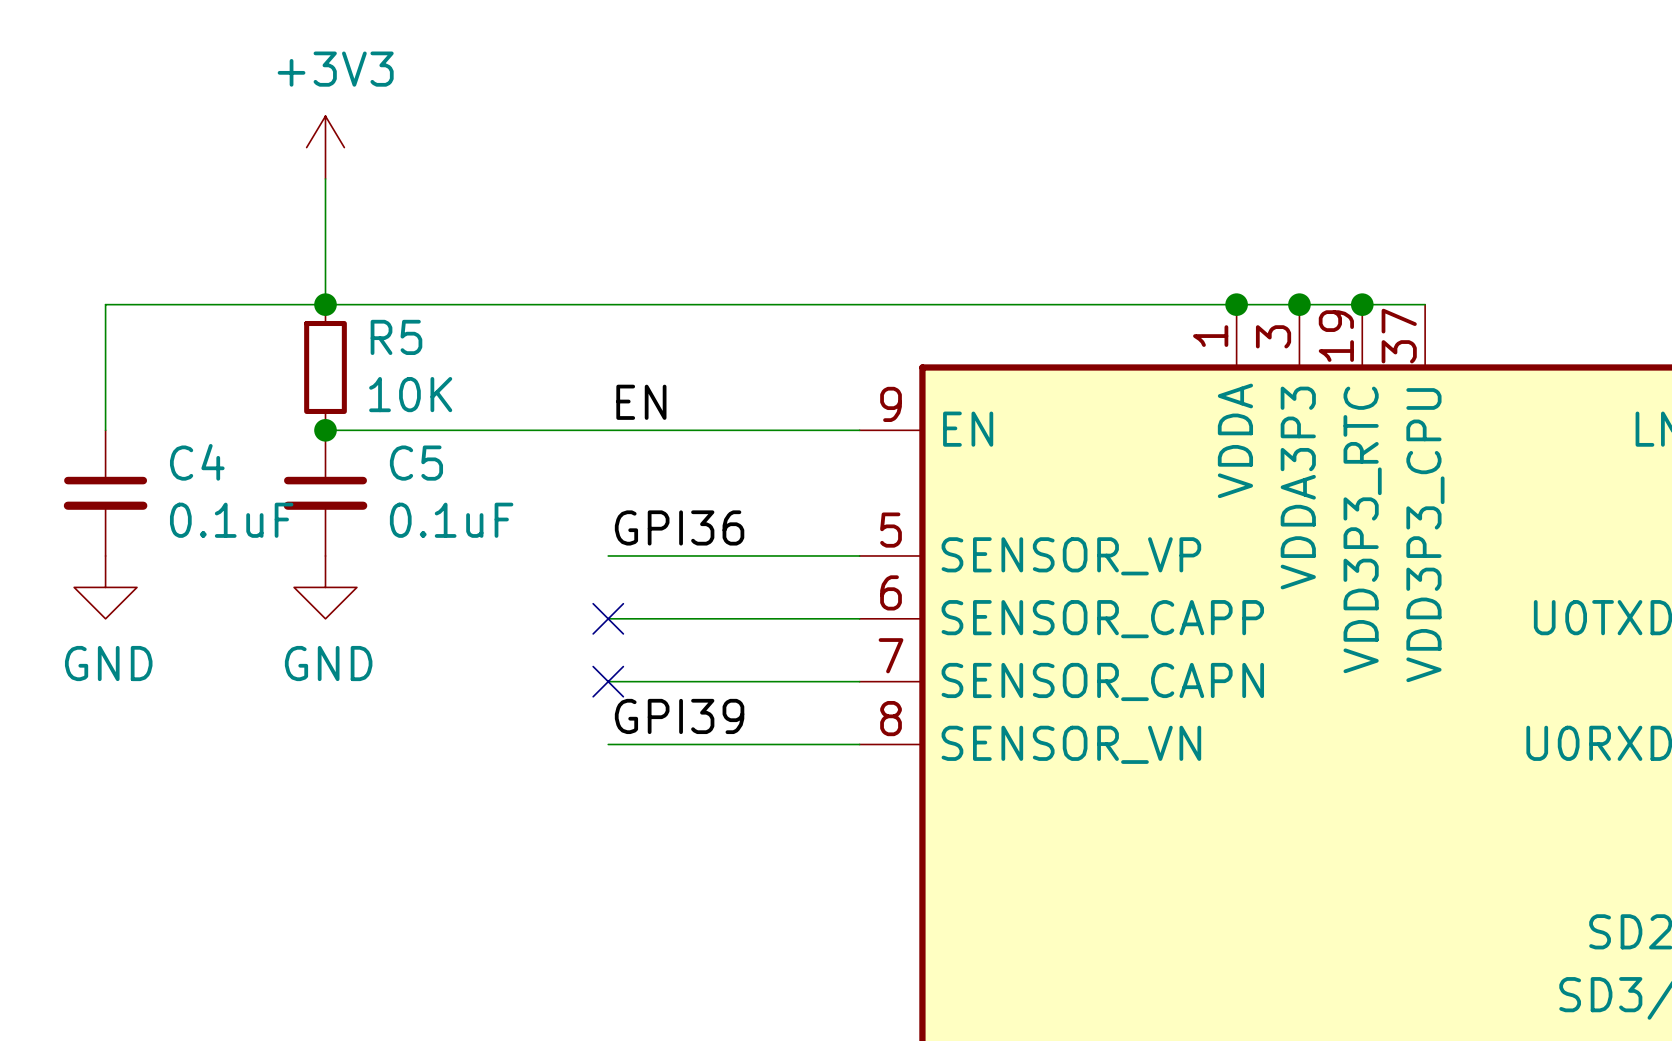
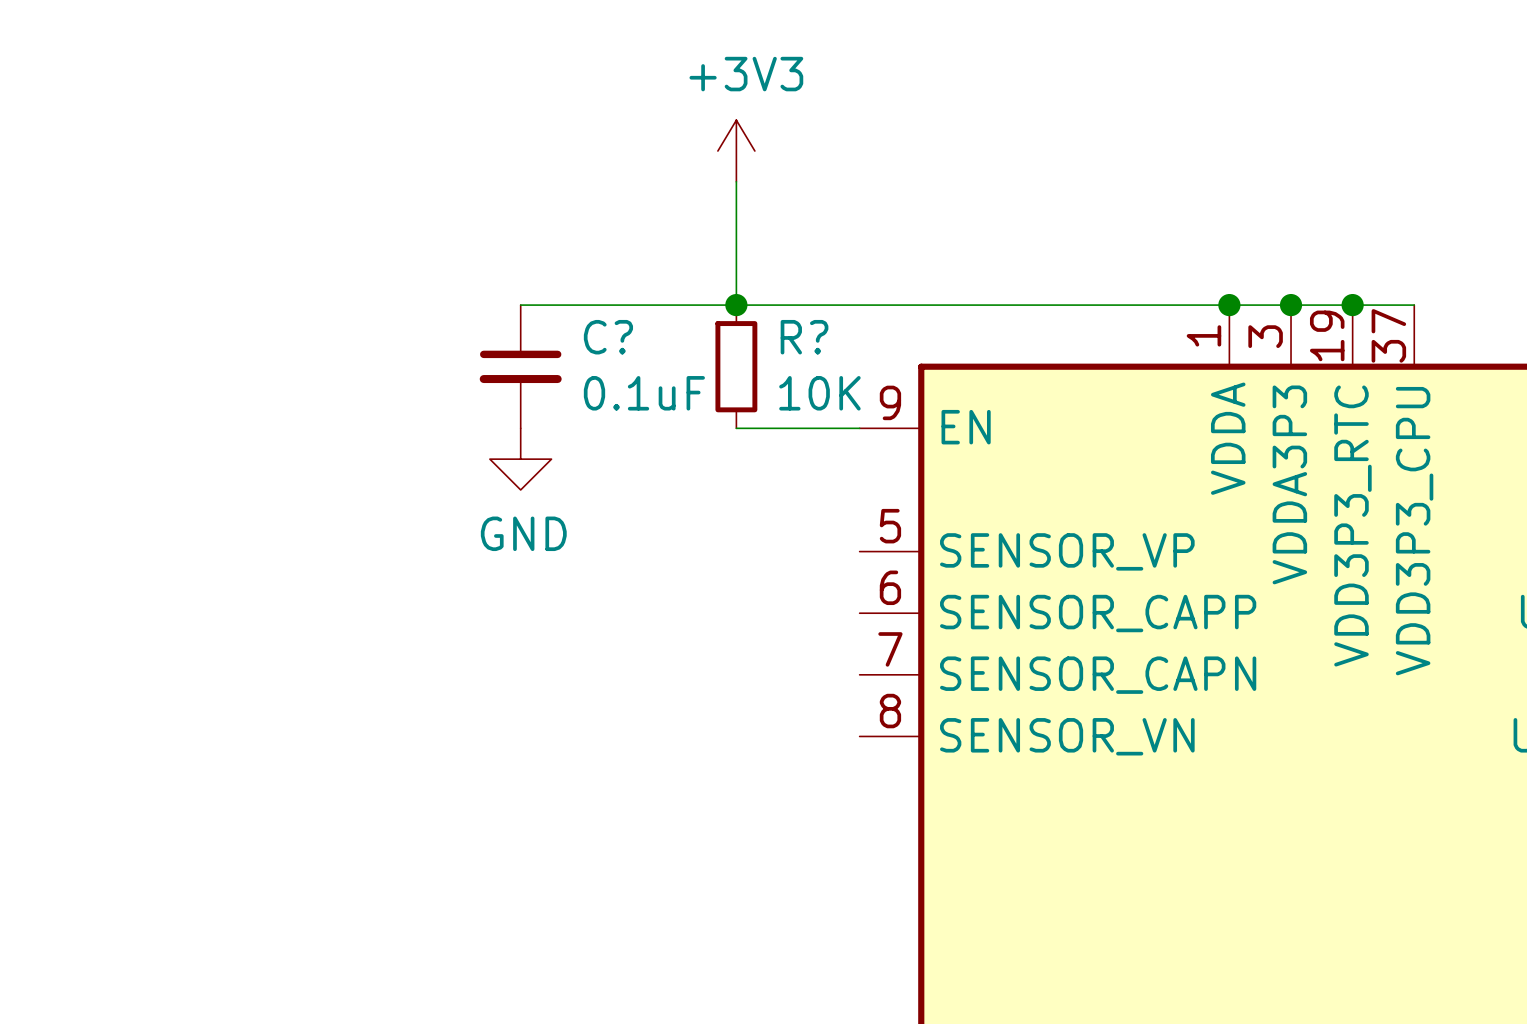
power symbol position: +3V3 (325, 147) -> +3V3 (736, 151)
wire: (325, 178) (325, 304) -> (736, 181) (736, 305)
junction: (325, 304) -> none
wire: (514, 304) (105, 304) (105, 430) -> none
junction: none -> (736, 305)
R5: 10K (325, 367) -> none
C?: none -> 0.1uF (520, 366)
R?: none -> 10K (736, 366)
label: EN (641, 402) -> none
wire: (325, 430) (733, 430) -> none
junction: (325, 430) -> none
power symbol: none -> GND (520, 459)
C4: 0.1uF (105, 493) -> none
C5: 0.1uF (325, 493) -> none
label: GPI36 (679, 527) -> none
wire: (608, 555) (859, 555) -> none
power symbol: GND (105, 587) -> none
power symbol: GND (325, 587) -> none
wire: (608, 618) (859, 618) -> none
no-connect mark: (608, 618) -> none
wire: (608, 681) (859, 681) -> none
no-connect mark: (608, 681) -> none
label: GPI39 (679, 716) -> none
wire: (608, 744) (859, 744) -> none

